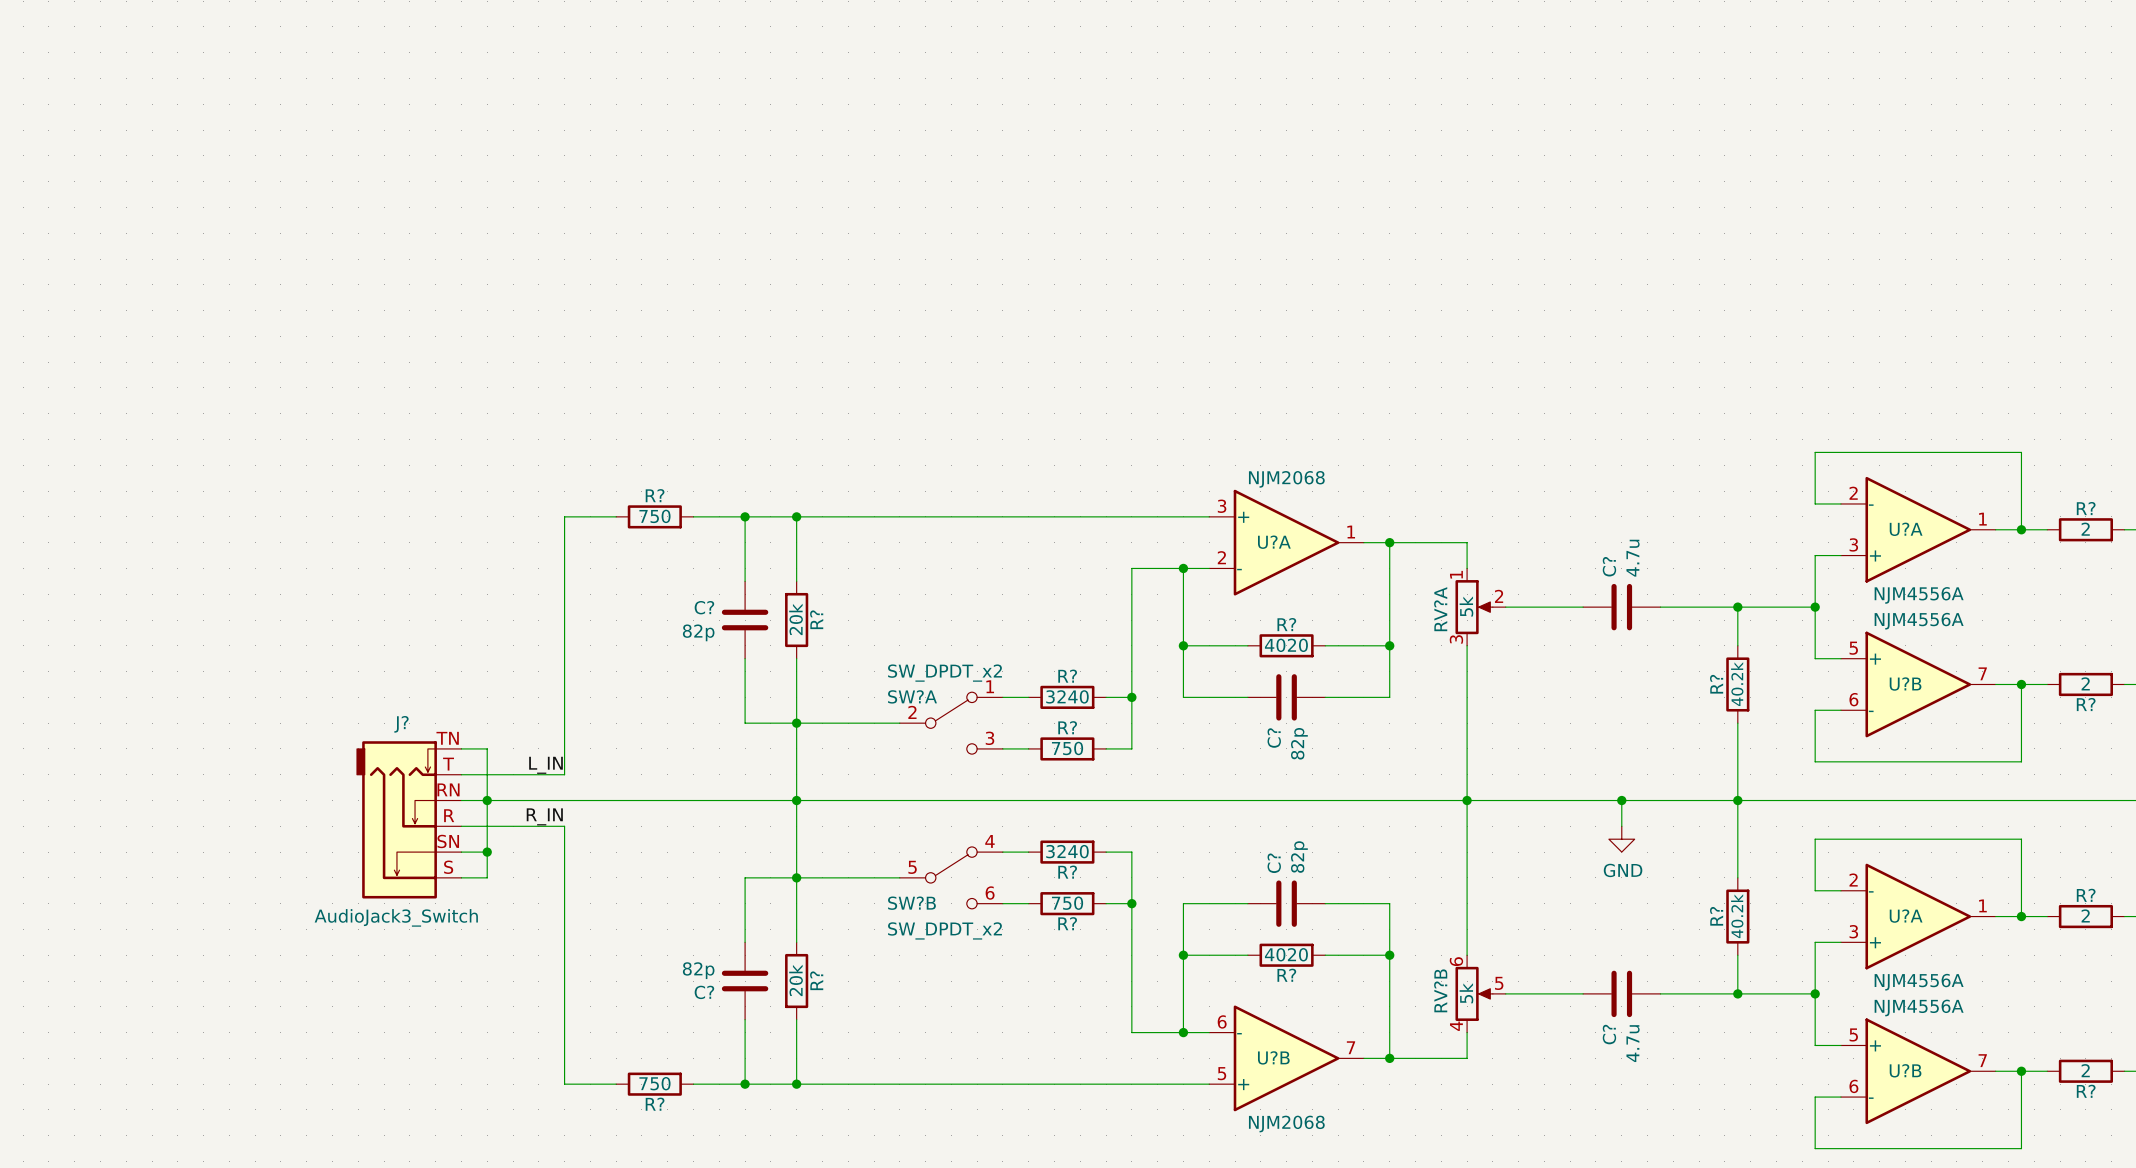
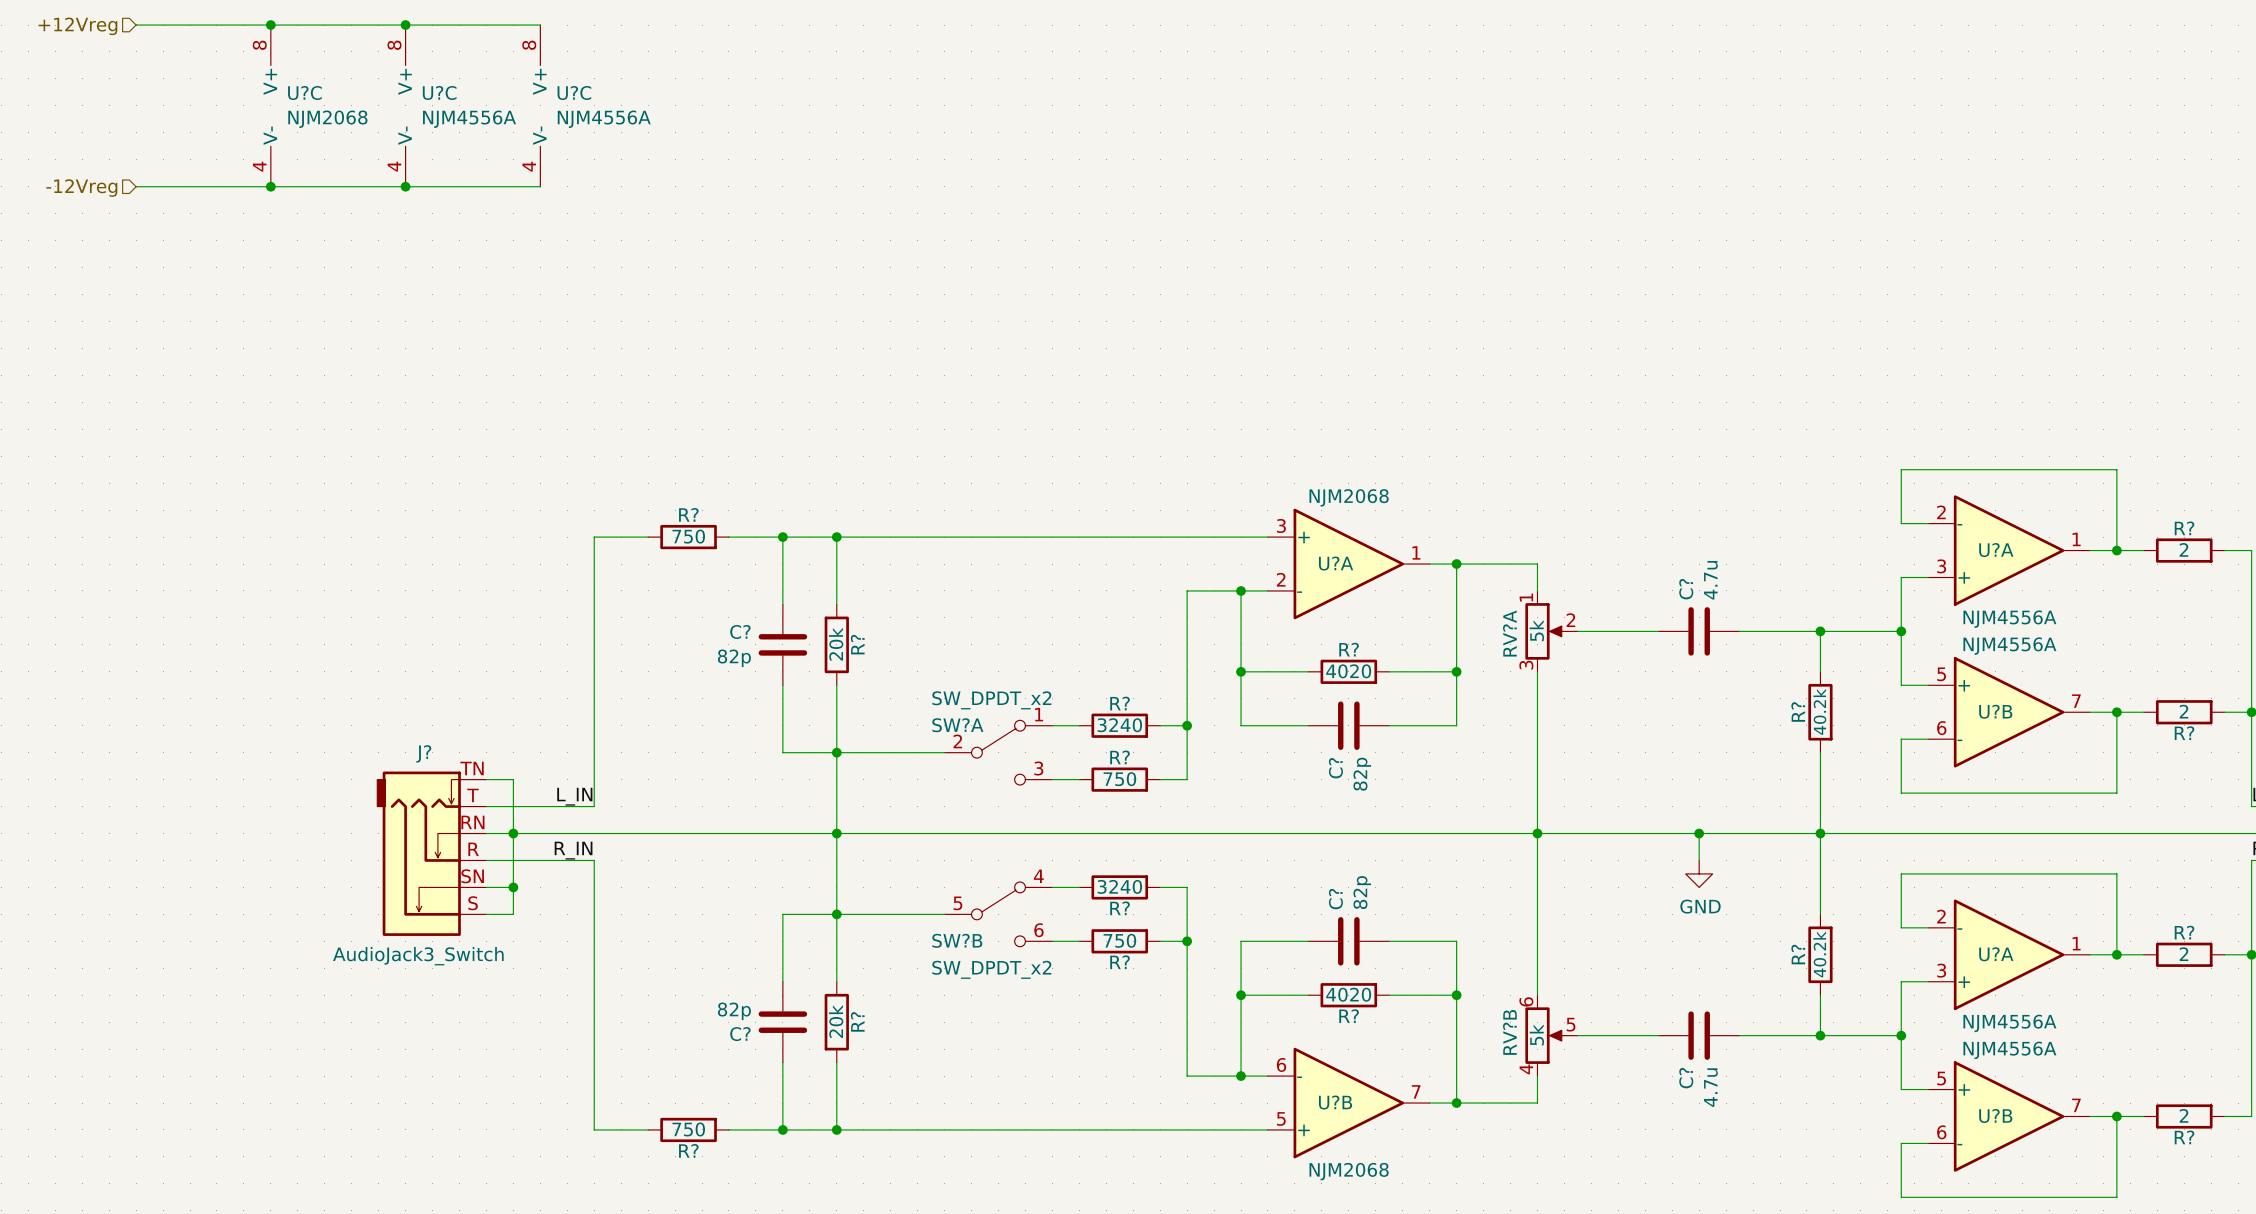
wire: none -> (136, 25) (540, 25)
junction: none -> (270, 25)
junction: none -> (405, 25)
hierarchical label: none -> +12Vreg (77, 26)
U?C: none -> NJM2068 (270, 105)
U?C: none -> NJM4556A (405, 105)
U?C: none -> NJM4556A (540, 105)
wire: none -> (136, 186) (540, 186)
junction: none -> (270, 186)
junction: none -> (405, 186)
hierarchical label: none -> -12Vreg (81, 188)

